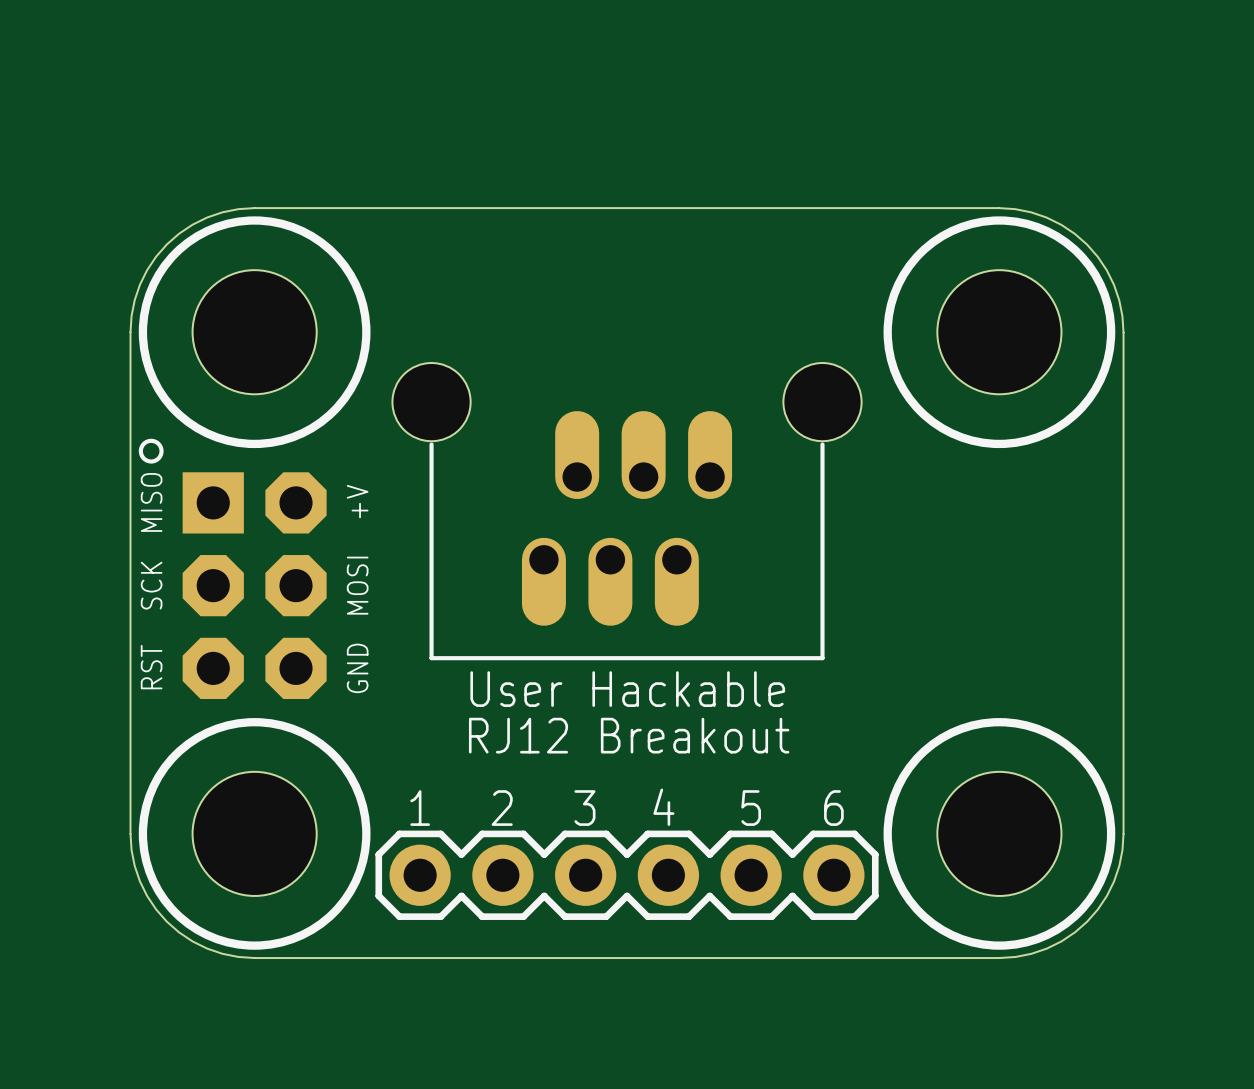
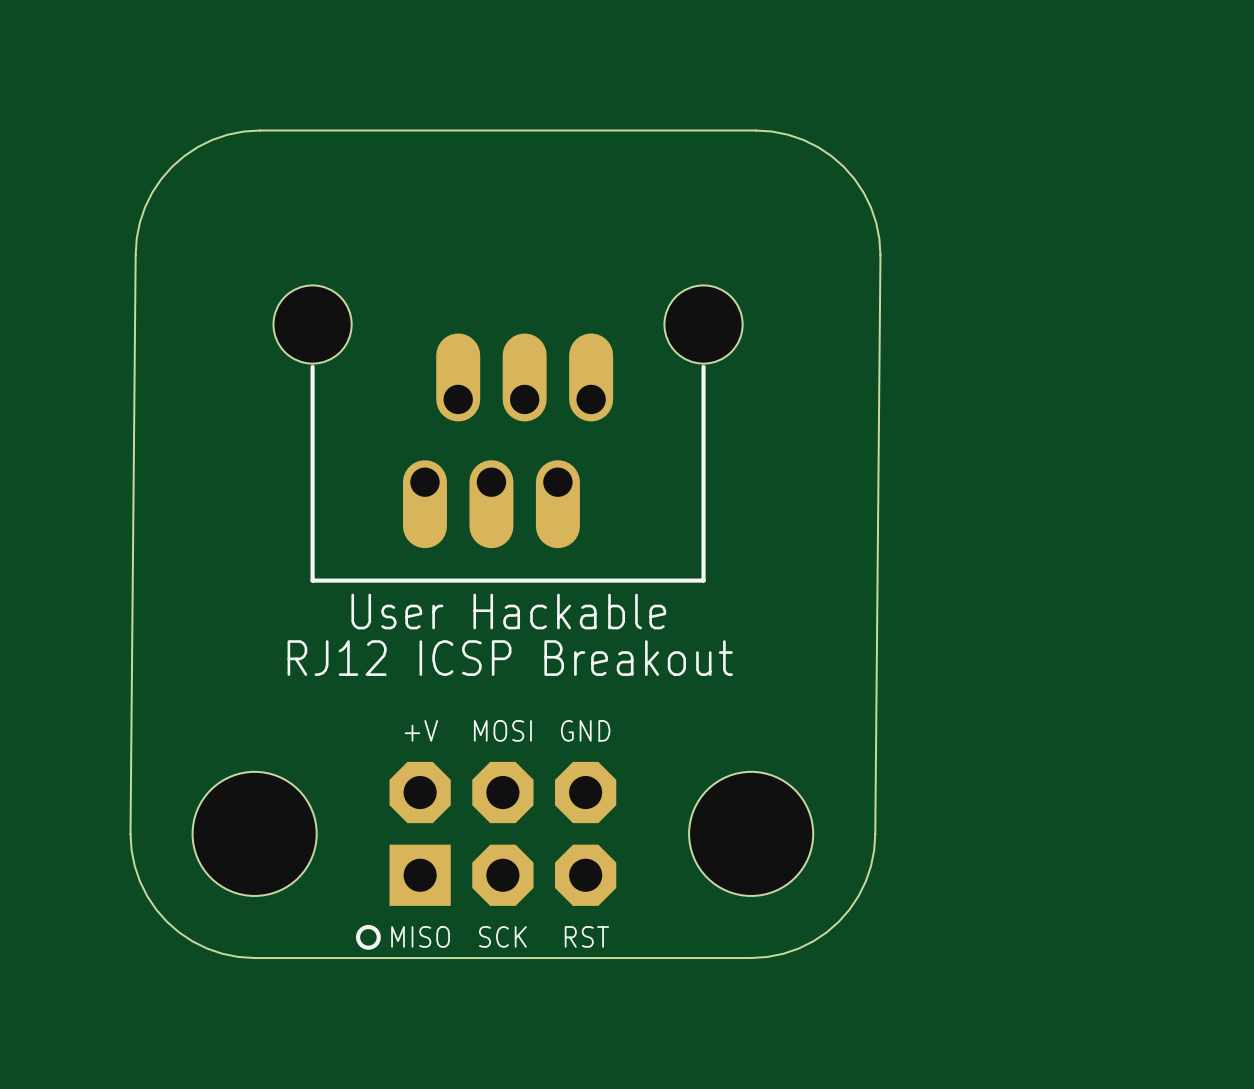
drawing: [138, 216, 371, 449] -> none
drawing: [883, 216, 1116, 449] -> none
hole: (254, 332) -> none
hole: (999, 332) -> none
part position: (627, 511) -> (508, 434)
part: (232, 568) -> none
text: none -> RJ12 ICSP Breakout (510, 658)
text position: User Hackable (627, 689) -> User Hackable (508, 611)
drawing: [138, 718, 371, 950] -> none
drawing: [883, 718, 1116, 950] -> none
text: RJ12 Breakout (629, 735) -> none
text: 4 (663, 807) -> none
text: 1 (420, 808) -> none
text: 2 (502, 808) -> none
text: 3 (584, 808) -> none
text: 5 (751, 808) -> none
text: 6 (833, 808) -> none
board edge: (130, 833) (131, 316) (134, 300) (147, 270) (166, 244) (179, 233) (207, 217) (238, 209) (254, 208) (998, 208) (1031, 212) (1046, 217) (1074, 233) (1097, 256) (1114, 284) (1122, 316) (1123, 833) (1119, 866) (1114, 881) (1106, 895) (1087, 921) (1061, 941) (1031, 953) (999, 958) (751, 958) -> (130, 833) (135, 254) (136, 238) (145, 207) (152, 192) (172, 166) (197, 147) (212, 139) (227, 134) (259, 130) (755, 130) (788, 134) (818, 147) (843, 166) (854, 179) (870, 207) (879, 238) (875, 833) (871, 866) (865, 881) (858, 895) (838, 921) (813, 941) (798, 948) (783, 953) (751, 958)
hole position: (999, 833) -> (751, 833)
part: none -> (486, 855)
part: (627, 875) -> none

